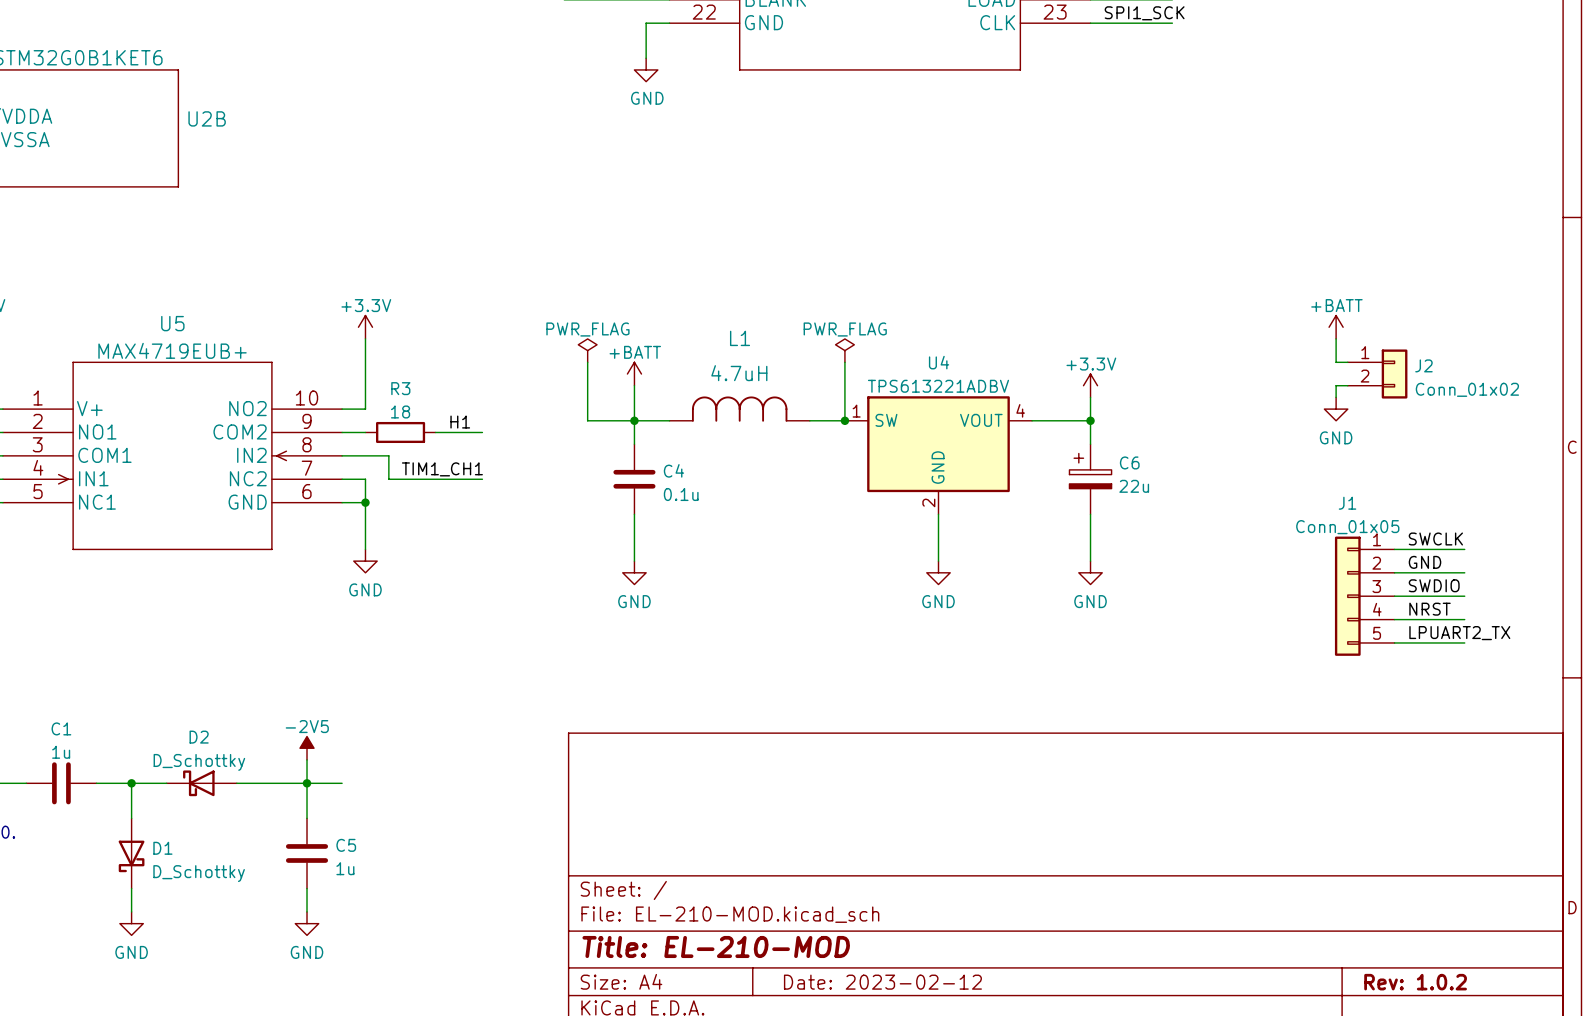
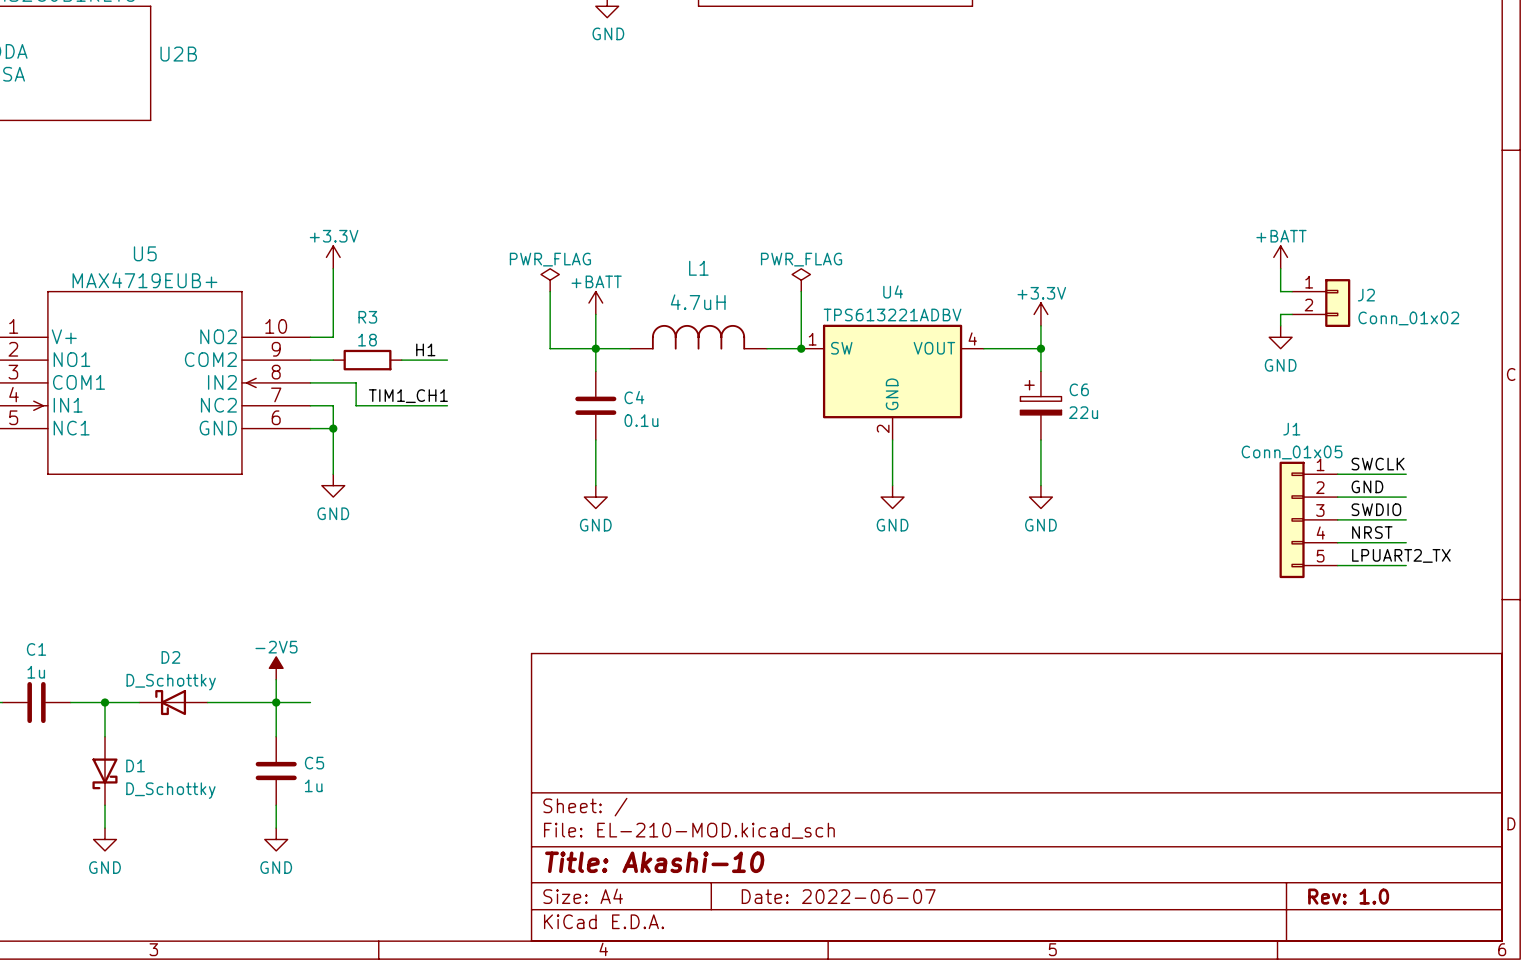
title block: Title: EL-210-MOD (716, 946) -> Title: Akashi-10 (654, 862)
title block: Date: 2023-02-12 (882, 982) -> Date: 2022-06-07 (838, 896)
title block: Rev: 1.0.2 (1415, 982) -> Rev: 1.0 (1348, 896)

